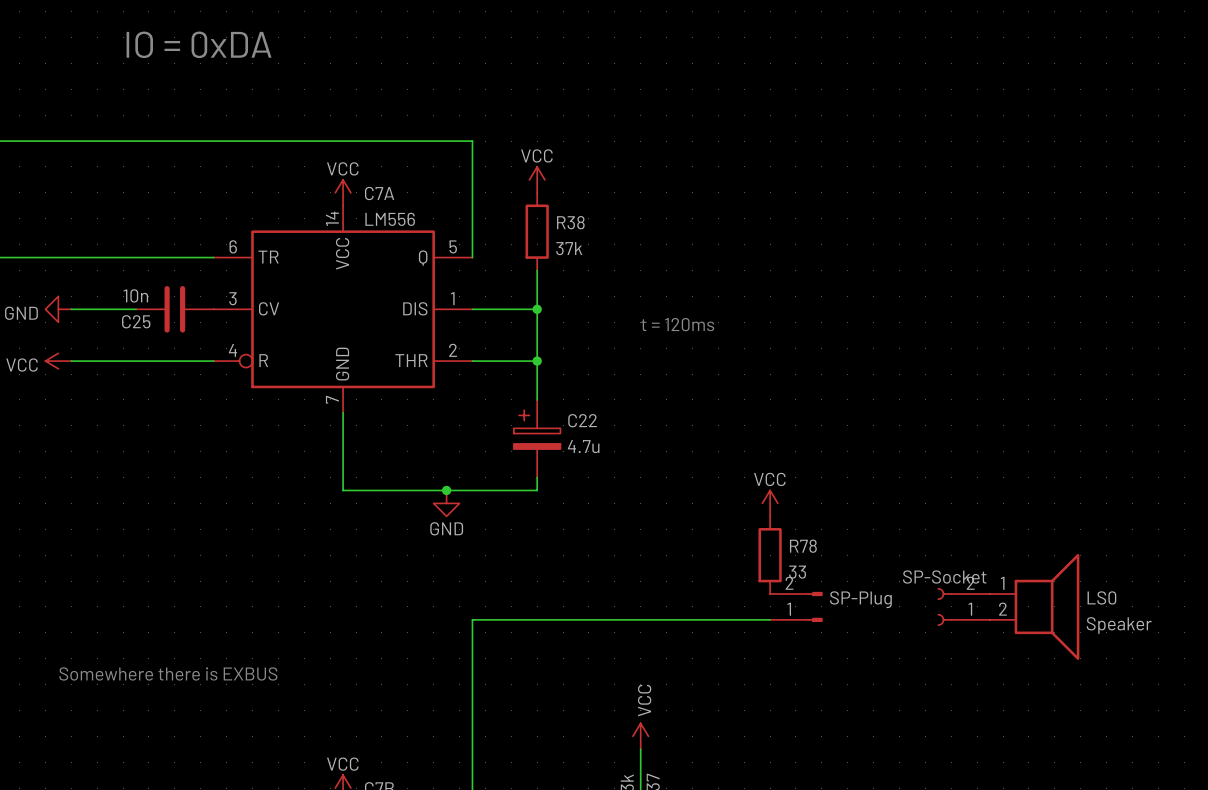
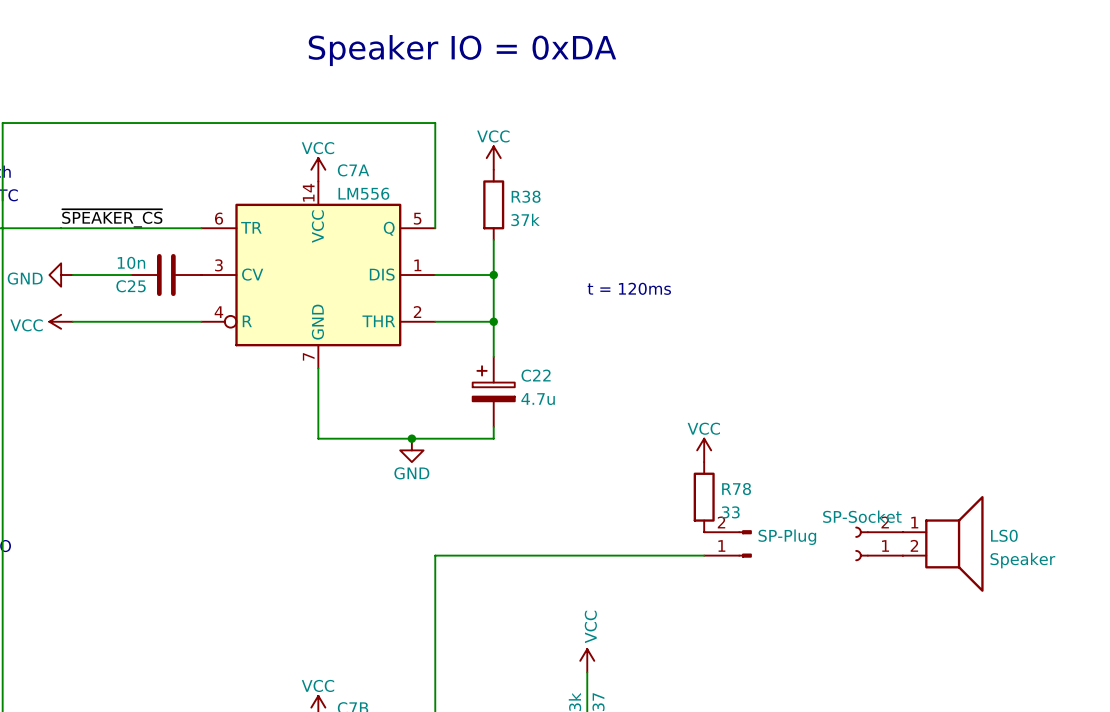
text: IO = 0xDA (199, 44) -> Speaker IO = 0xDA (462, 50)
label: none -> ~{SPEAKER_CS} (112, 218)
text: Somewhere there is EXBUS (168, 673) -> none

